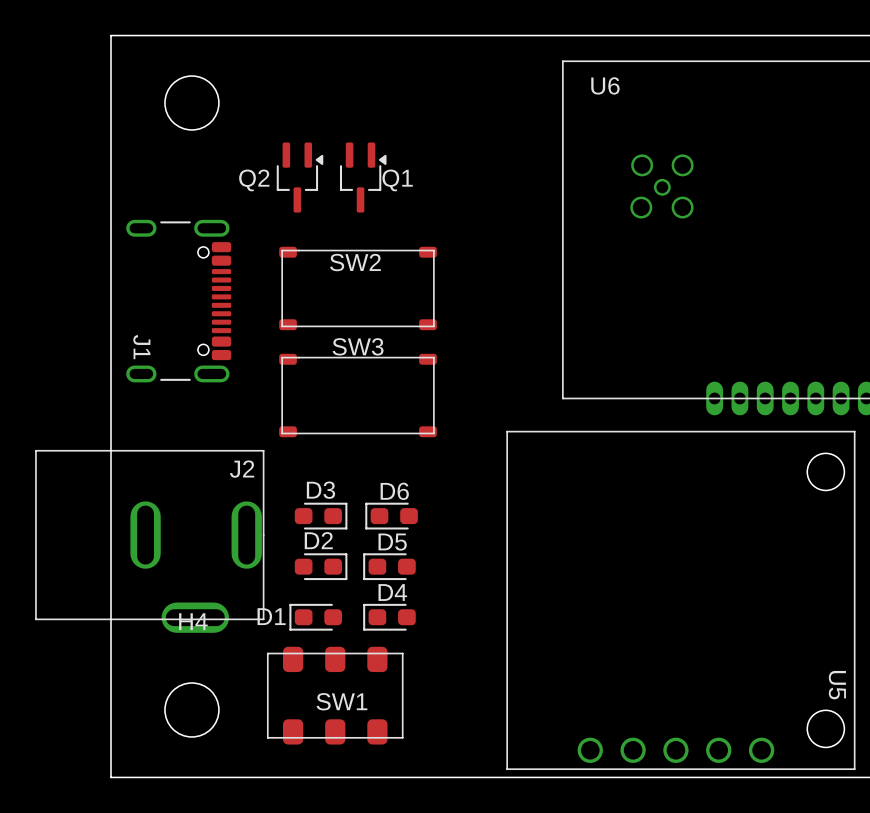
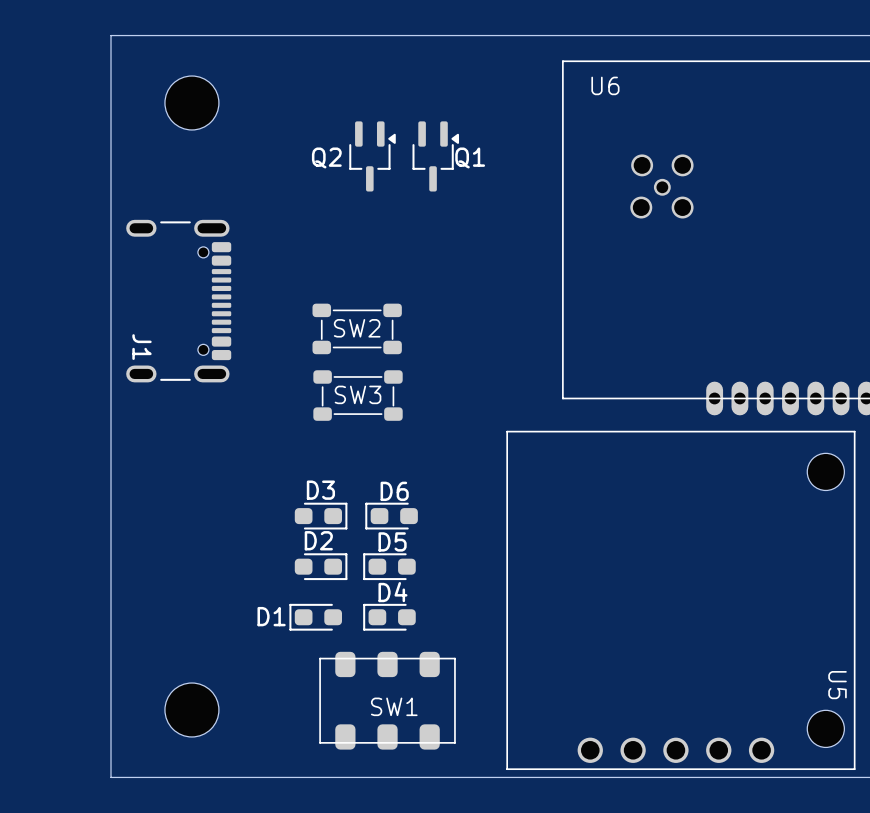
Q2 position: (300, 177) -> (372, 156)
Q1 position: (363, 177) -> (435, 156)
SW2 footprint: [279, 246, 437, 331] -> [312, 303, 402, 355]
SW3 name position: SW3 (358, 346) -> SW3 (358, 394)
SW3 footprint: [279, 353, 437, 438] -> [313, 370, 403, 421]
J2: (149, 541) -> none
H4 name: H4 (193, 621) -> none
SW1 position: (335, 695) -> (387, 700)

